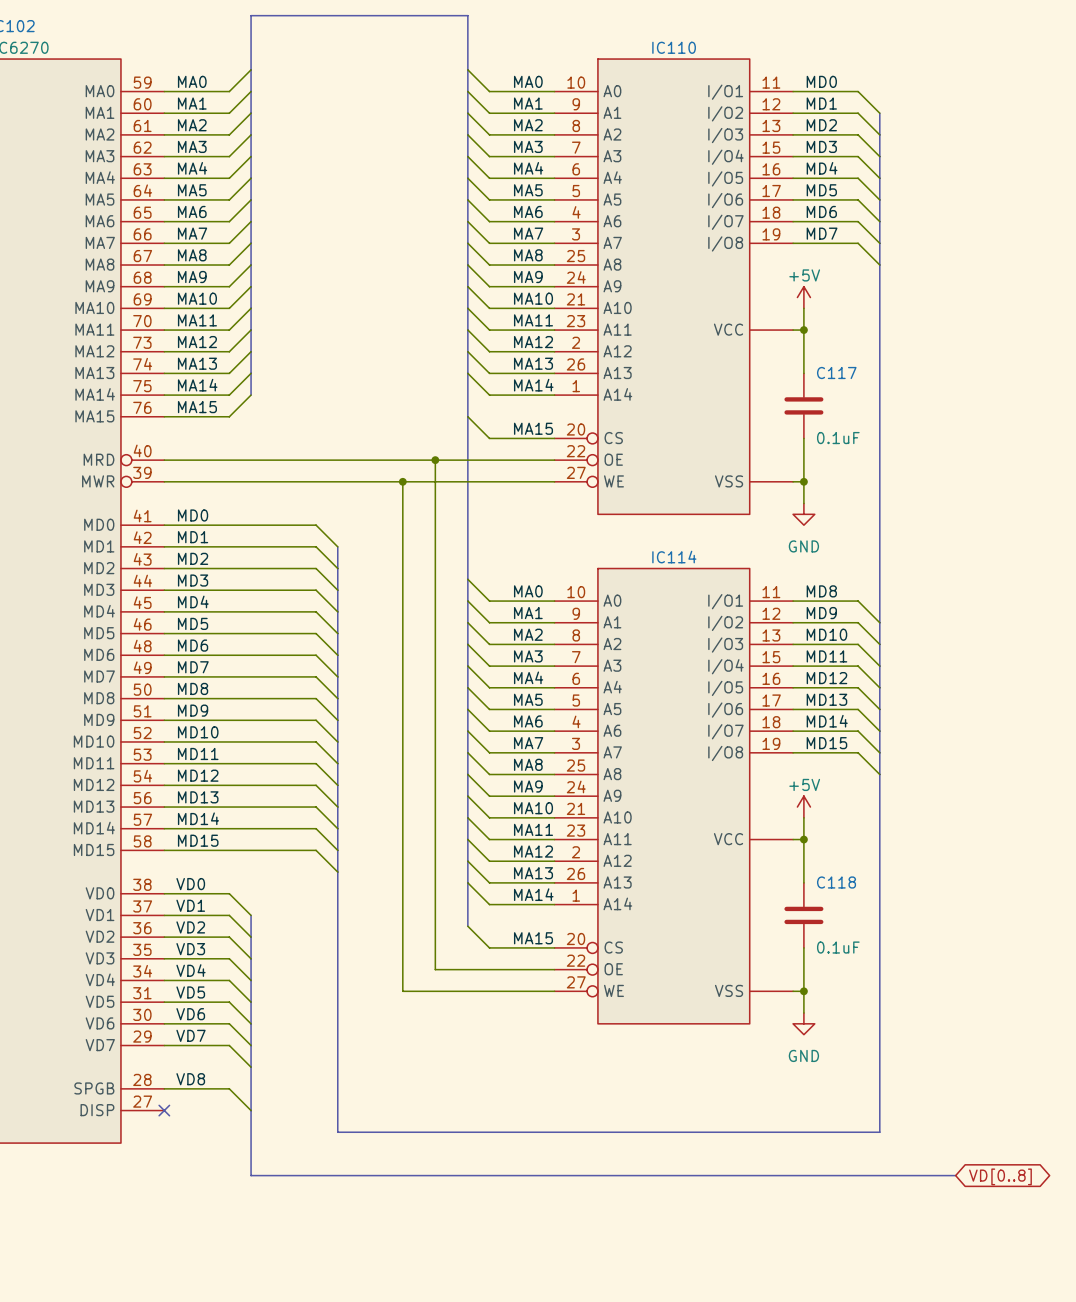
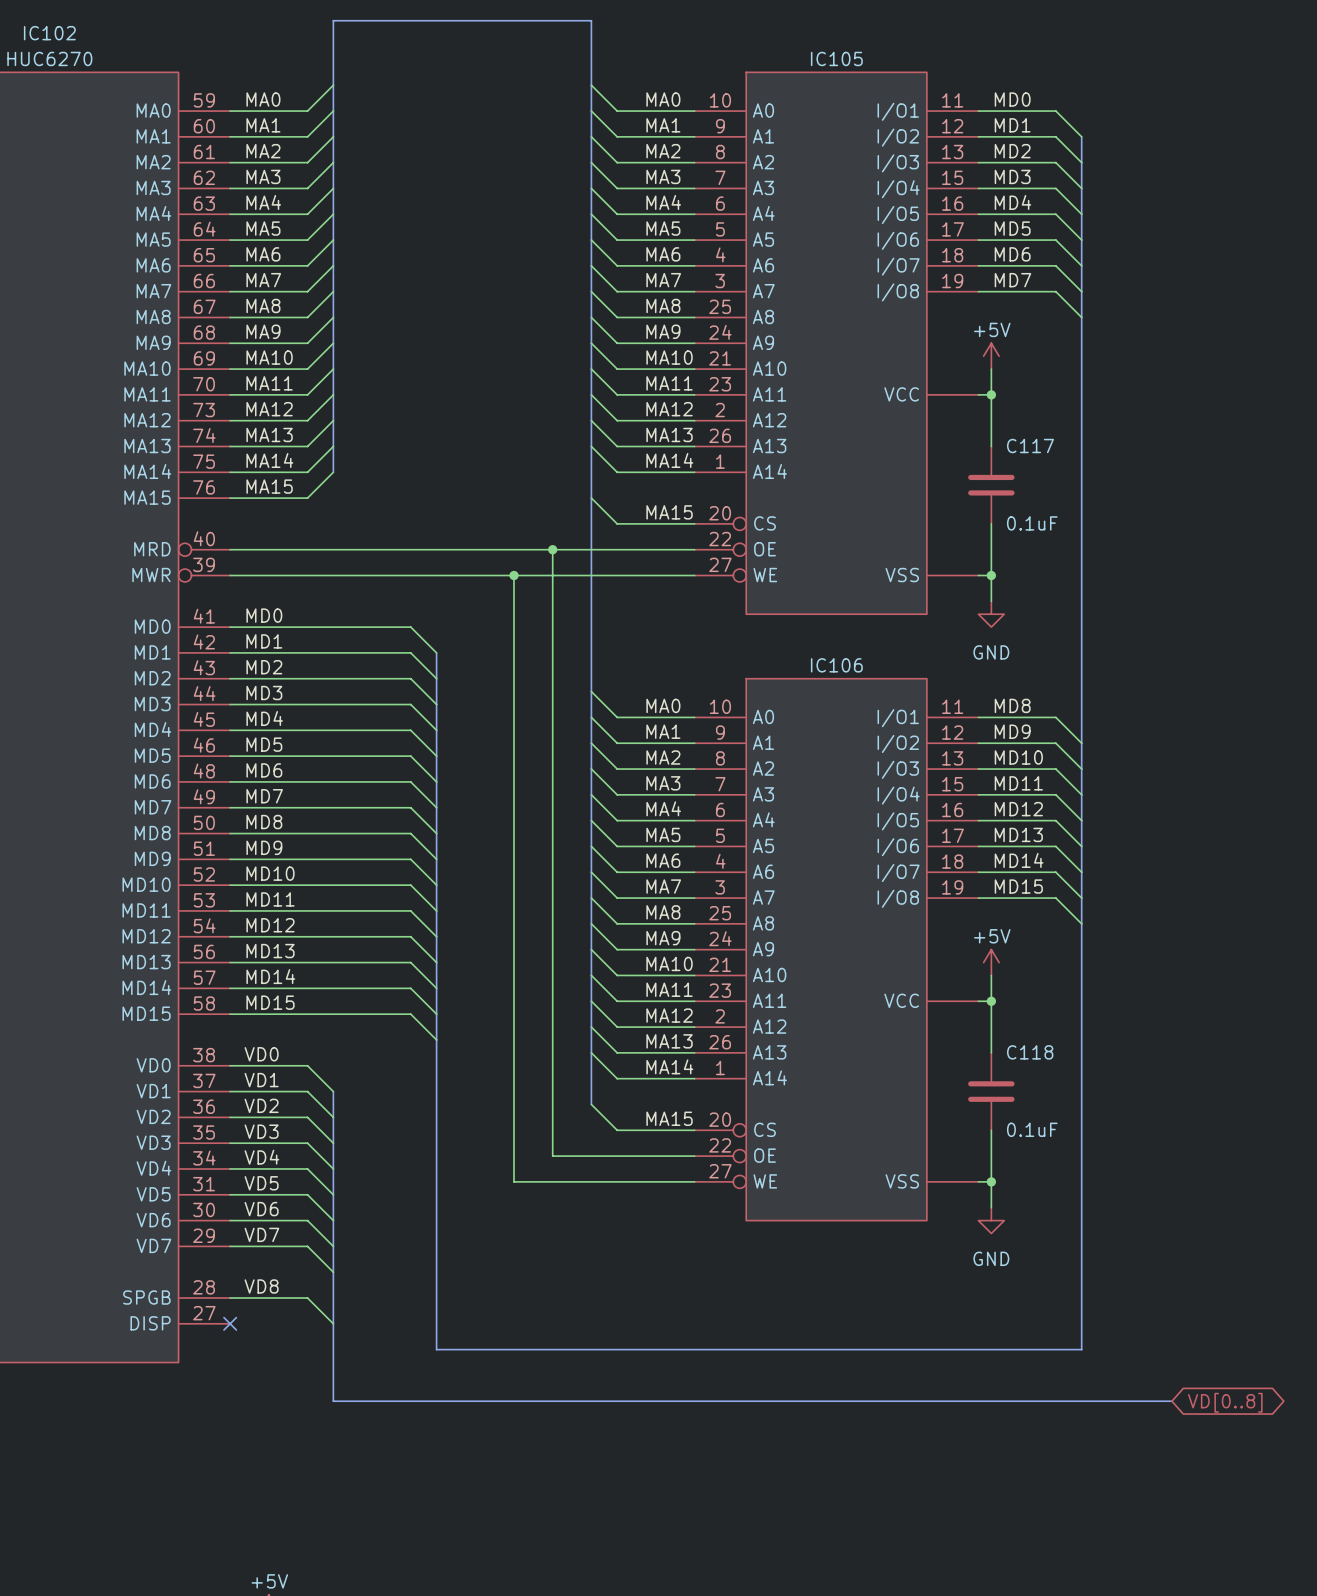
IC110 name: IC110 (674, 47) -> IC105 (836, 58)
IC114 name: IC114 (674, 557) -> IC106 (836, 665)

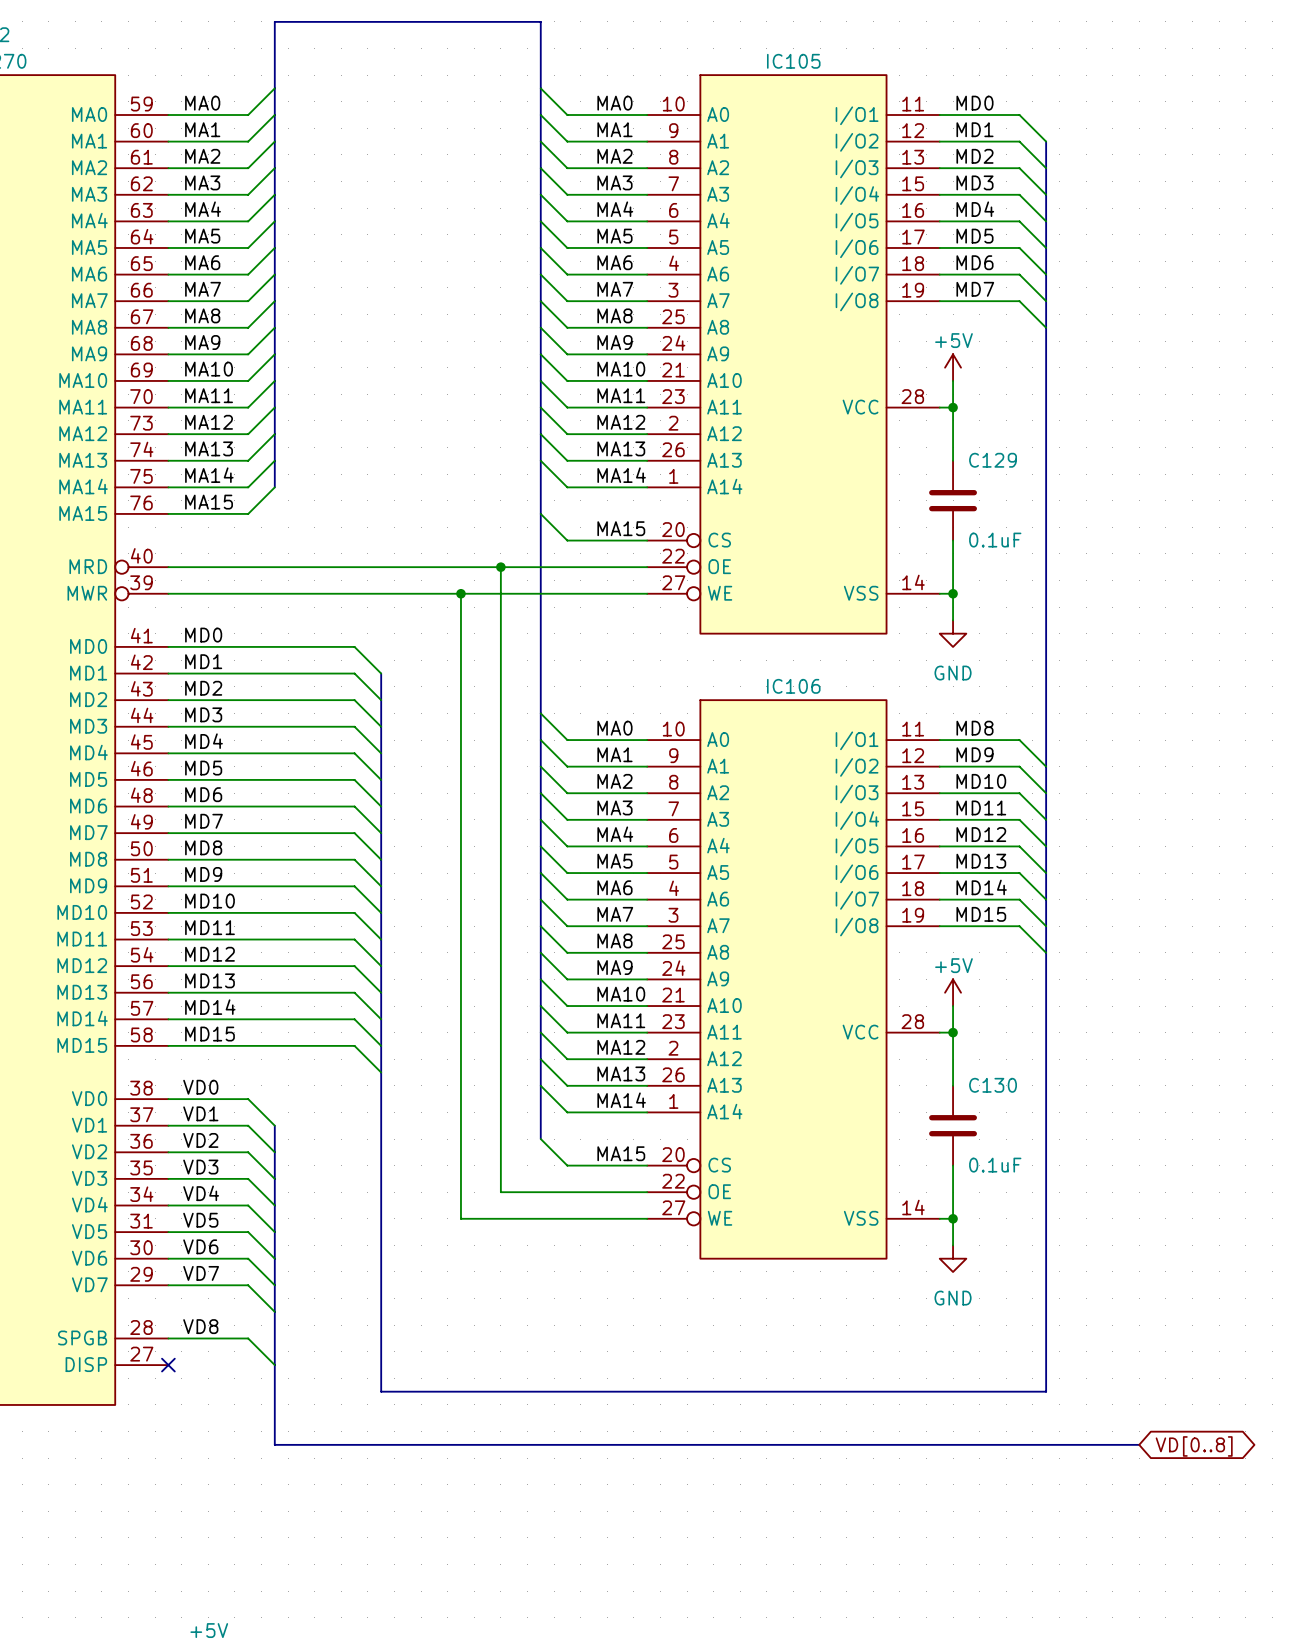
IC105 pin number: none -> 28 (912, 396)
C117 name: C117 (1030, 446) -> C129 (993, 460)
IC105 pin number: none -> 14 (913, 582)
IC106 pin number: none -> 28 (912, 1021)
C118 name: C118 (1030, 1052) -> C130 (993, 1085)
IC106 pin number: none -> 14 (913, 1207)

